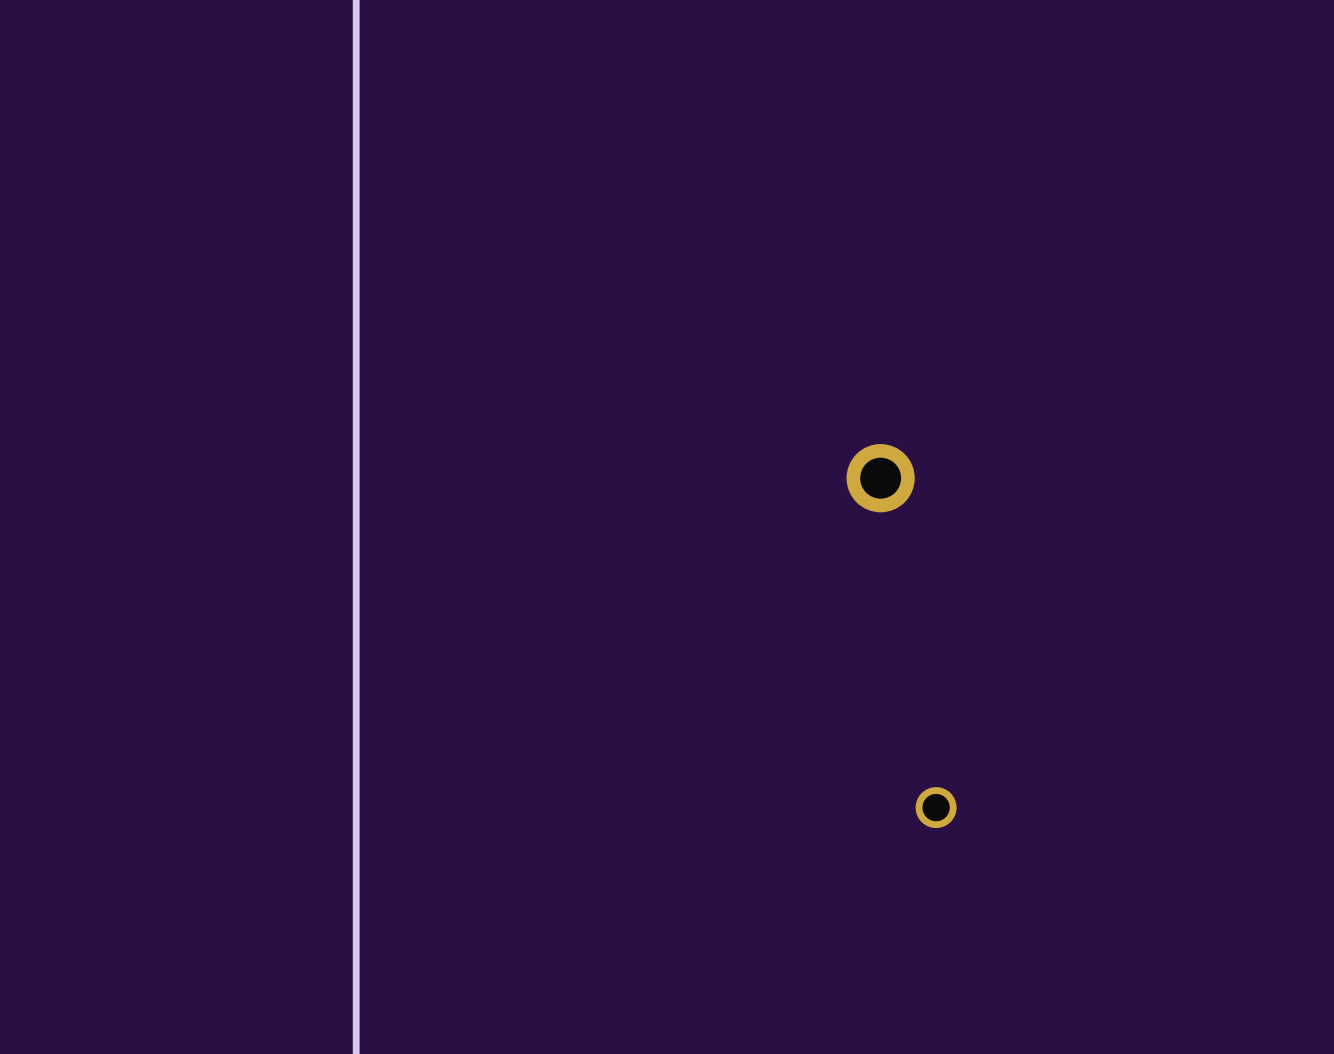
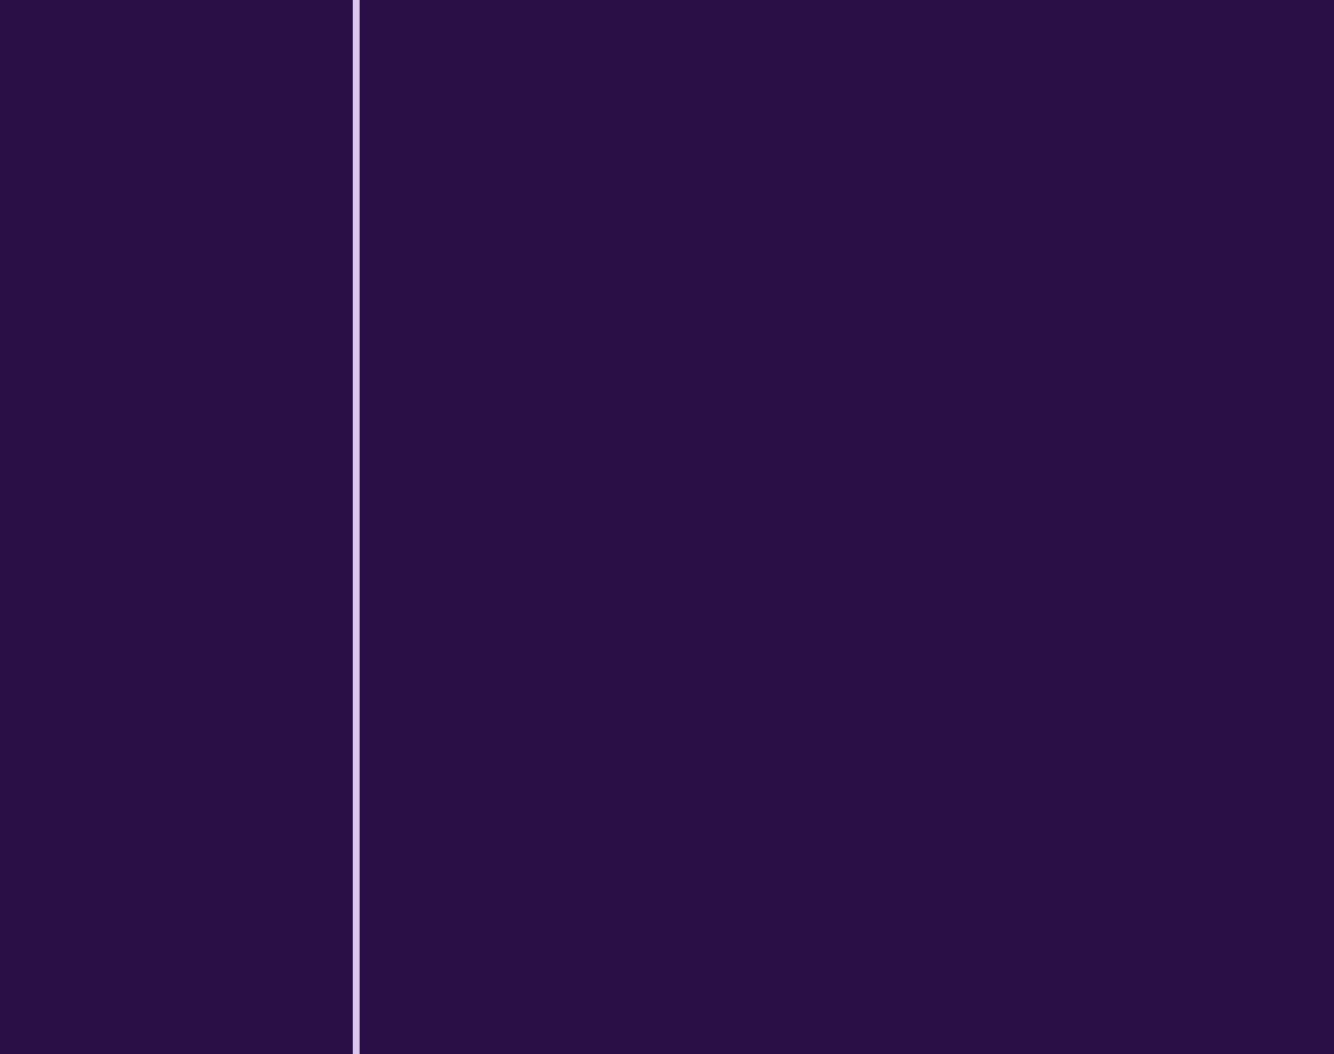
via: (880, 478) -> none
via: (936, 807) -> none

